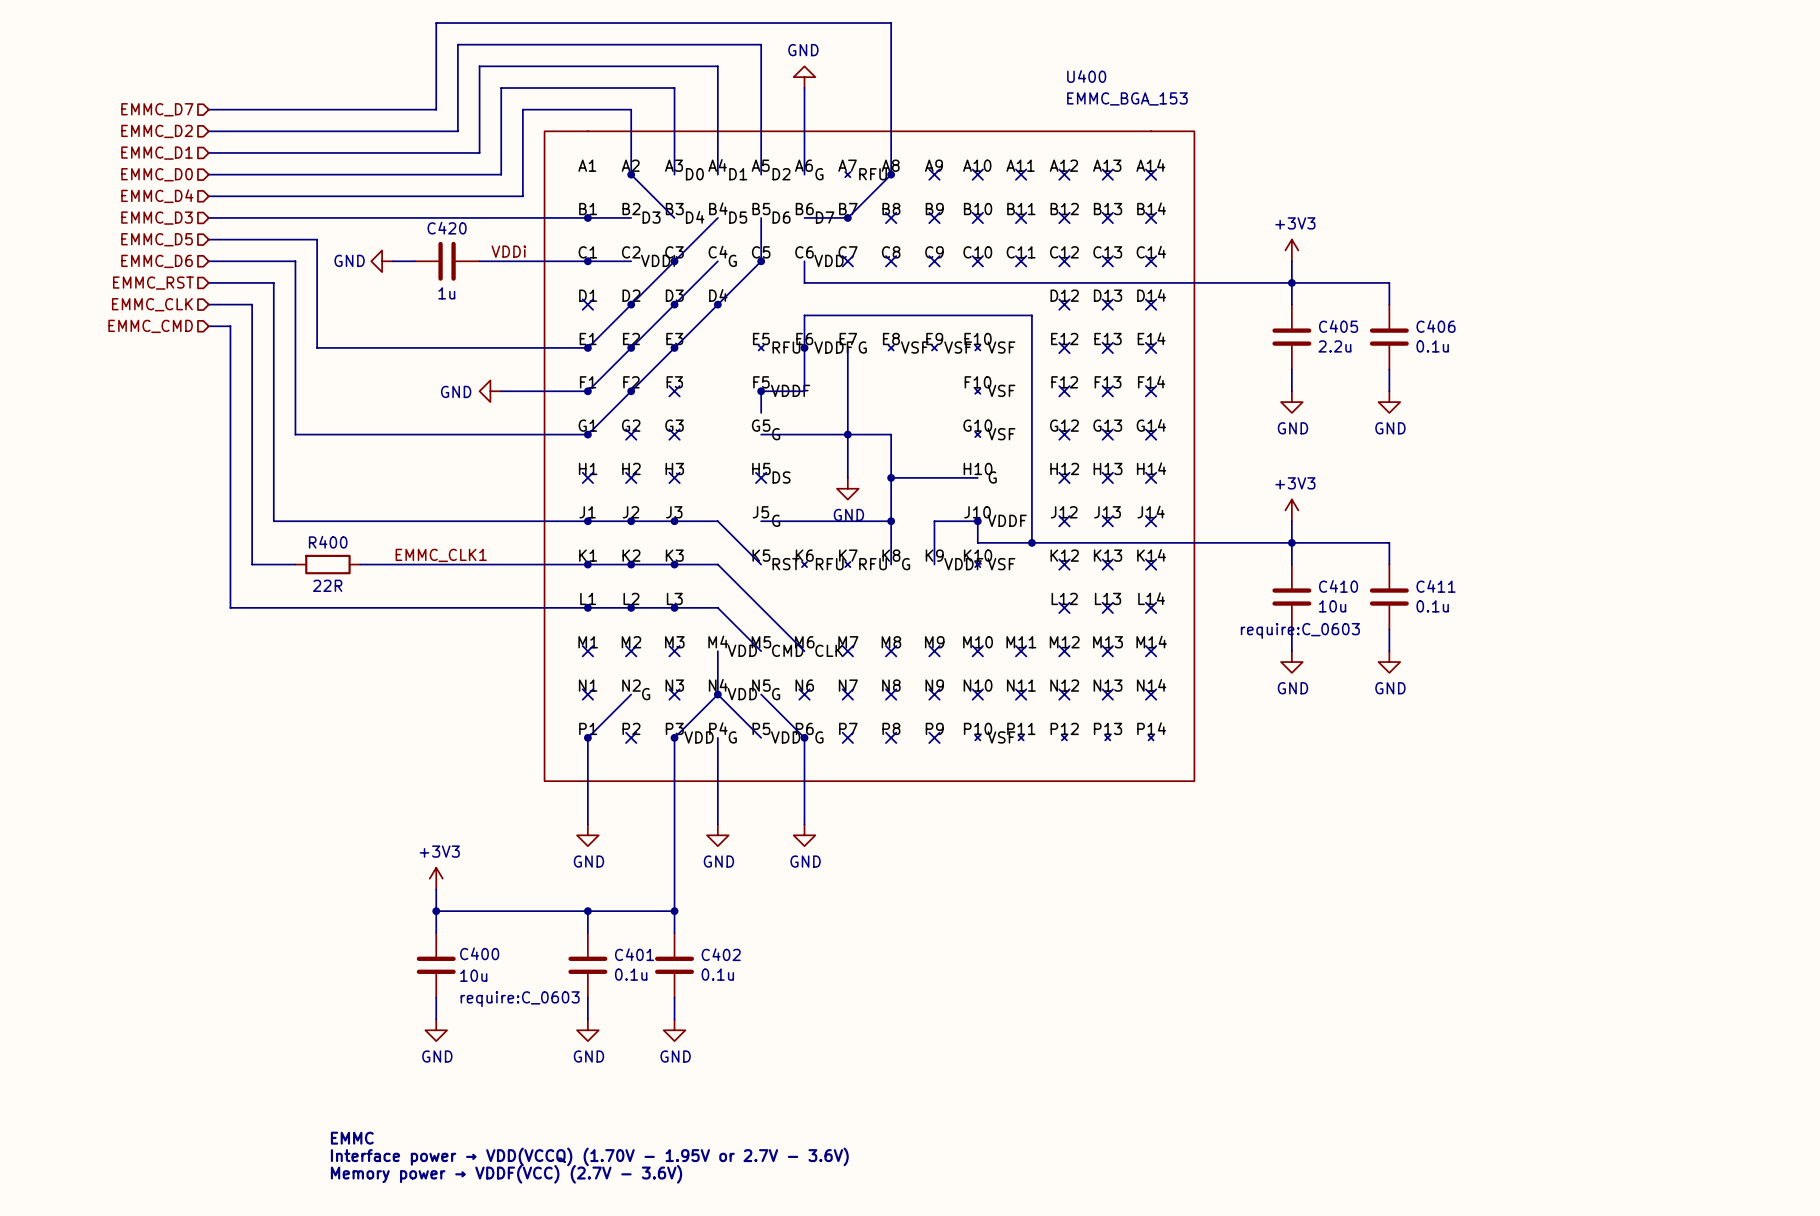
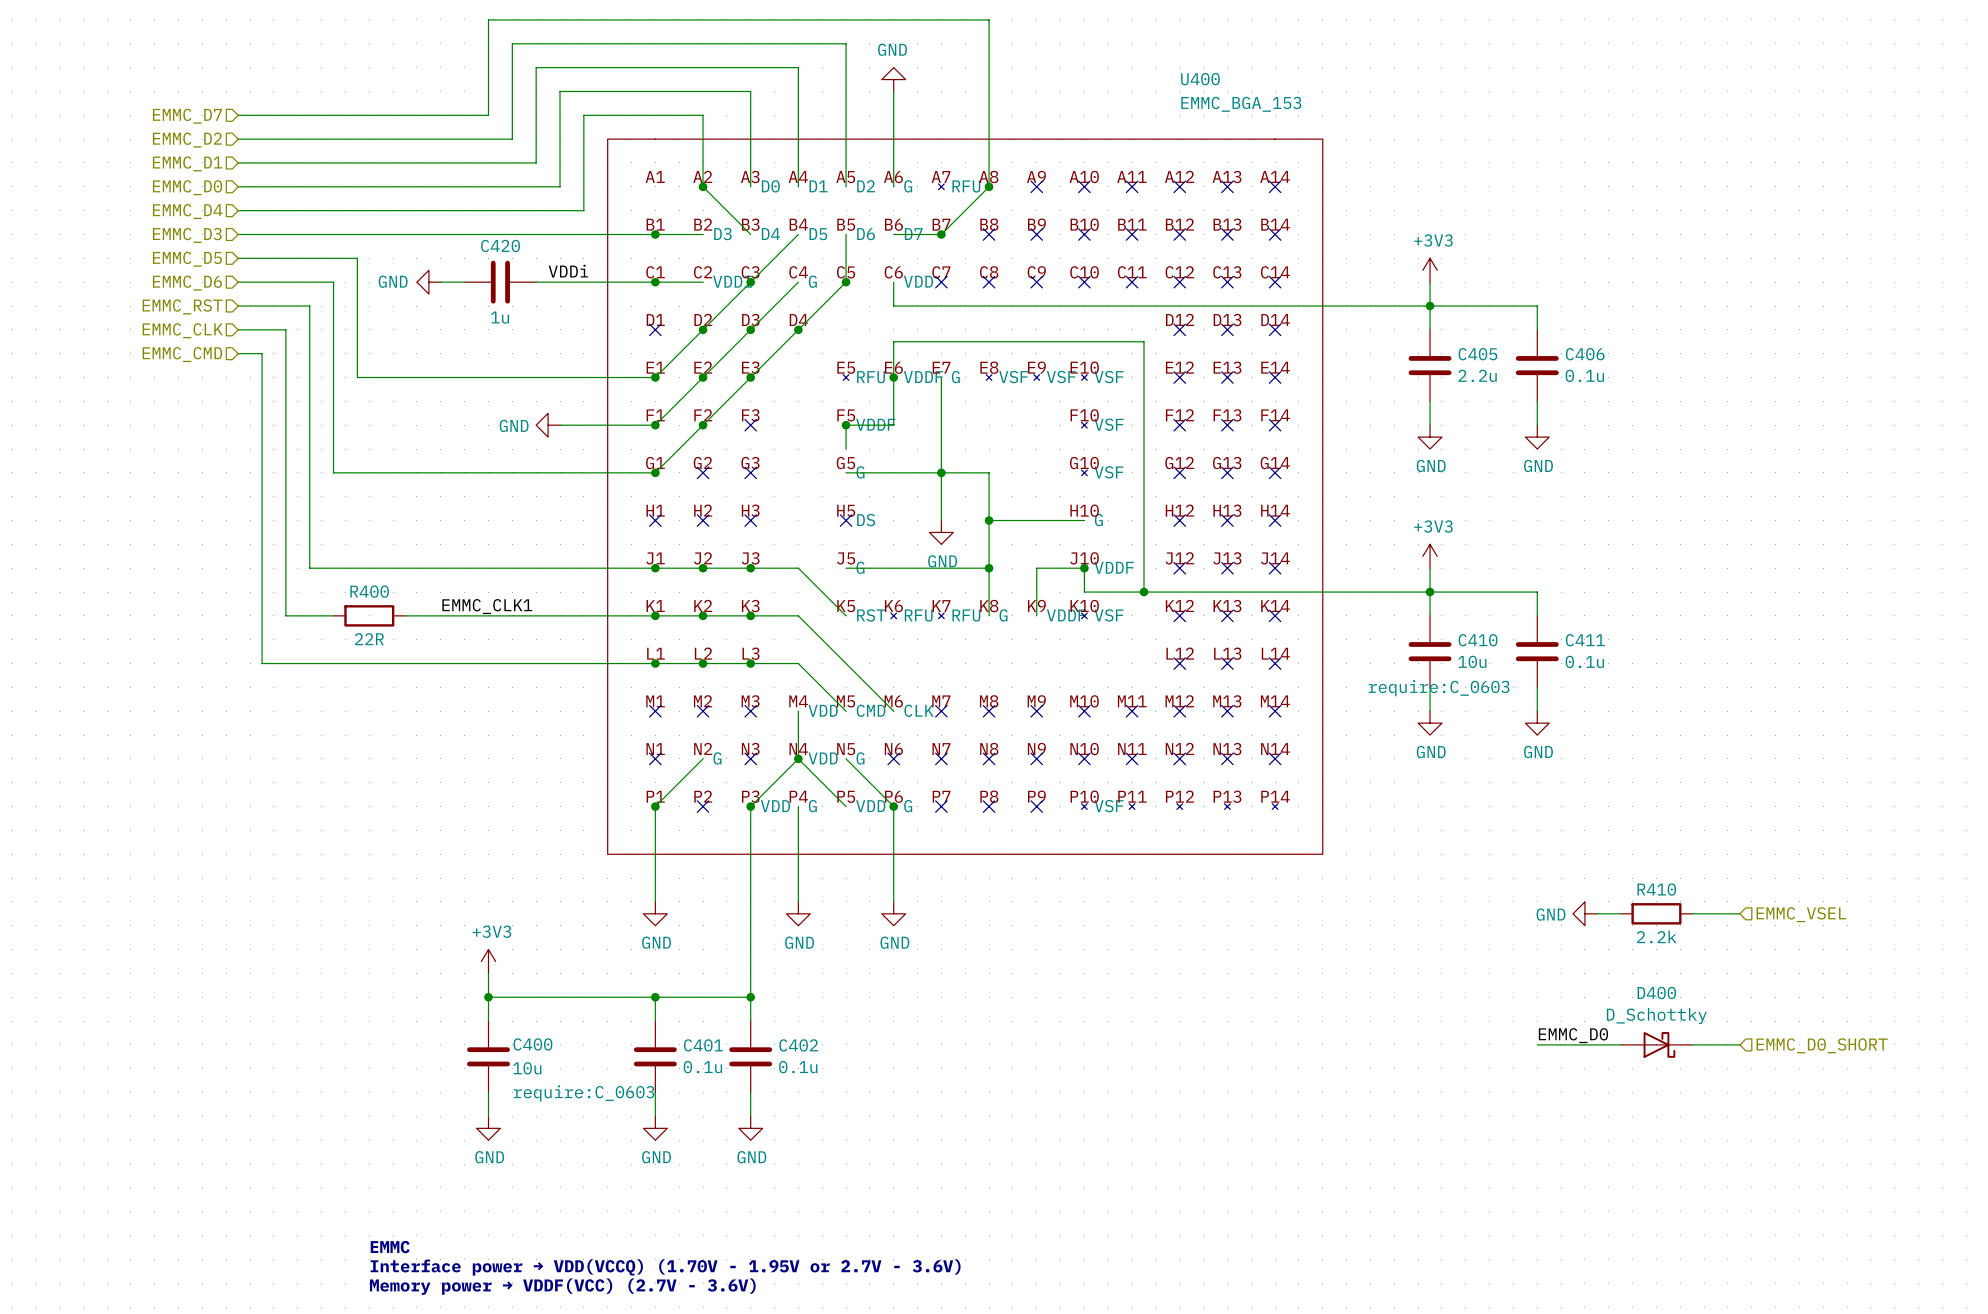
power symbol: none -> GND (1584, 913)
wire: none -> (1596, 913) (1620, 913)
R410: none -> 2.2k (1656, 913)
wire: none -> (1692, 913) (1739, 913)
hierarchical label: none -> EMMC_VSEL (1801, 914)
label: none -> EMMC_D0 (1573, 1035)
wire: none -> (1537, 1044) (1620, 1044)
D400: none -> D_Schottky (1656, 1044)
wire: none -> (1692, 1044) (1739, 1044)
hierarchical label: none -> EMMC_D0_SHORT (1822, 1045)

